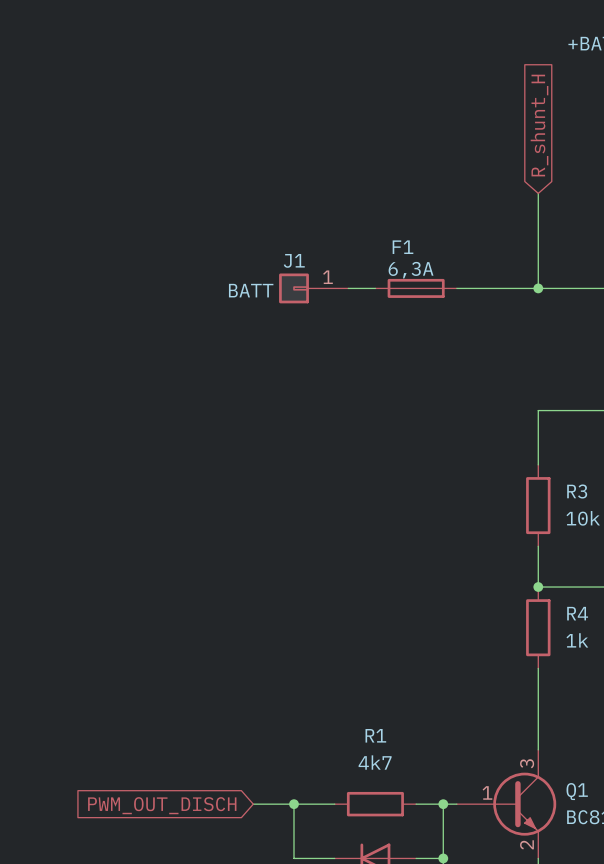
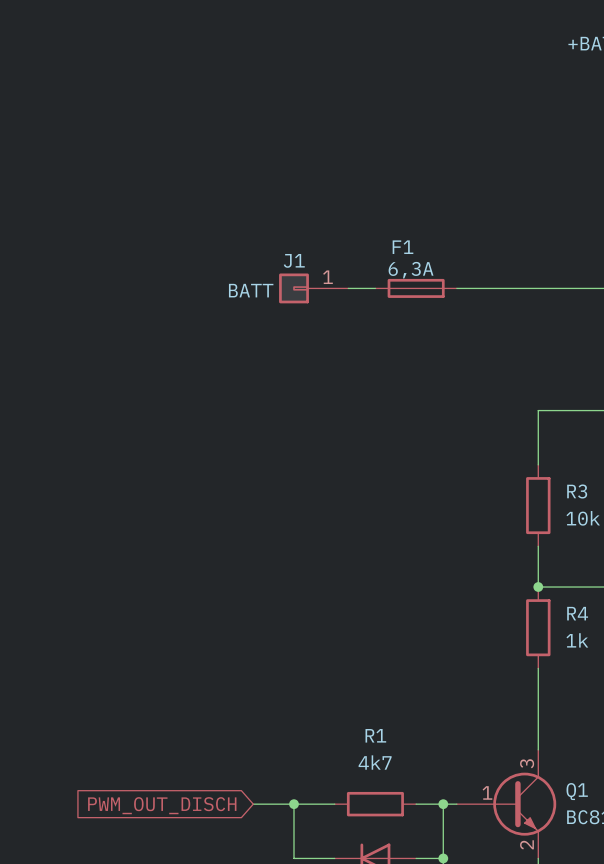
global label: R_shunt_H (539, 125) -> none
wire: (538, 193) (538, 288) -> none
junction: (538, 288) -> none

